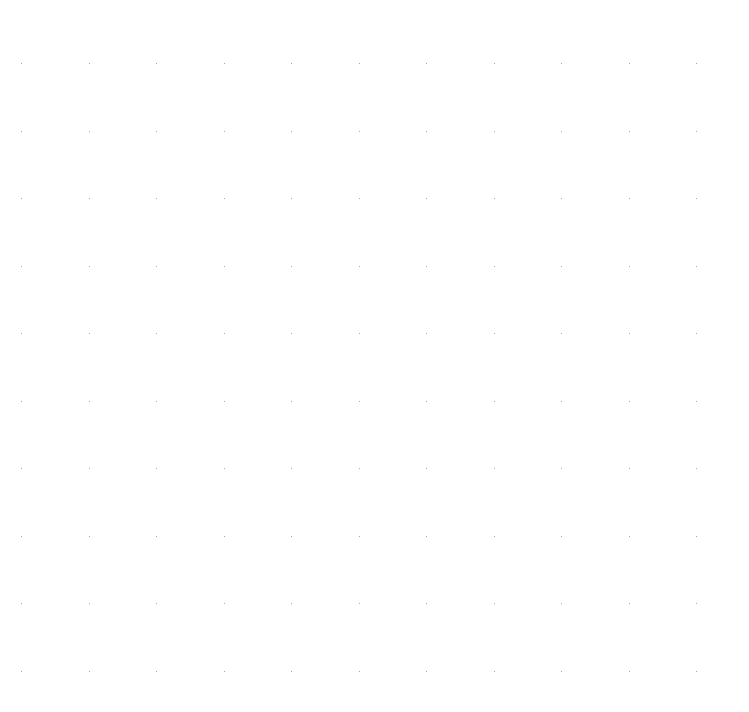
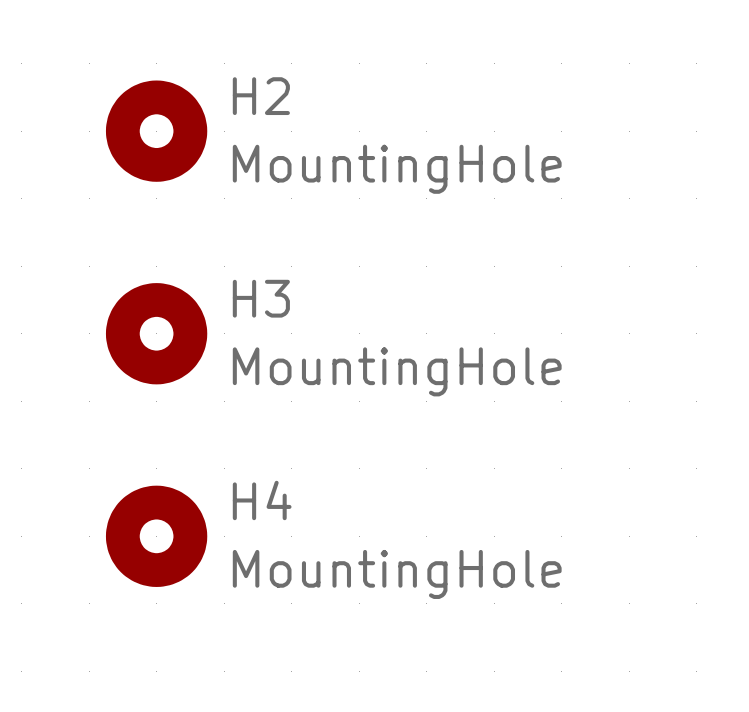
H2: none -> MountingHole (156, 131)
H3: none -> MountingHole (156, 333)
H4: none -> MountingHole (156, 536)

